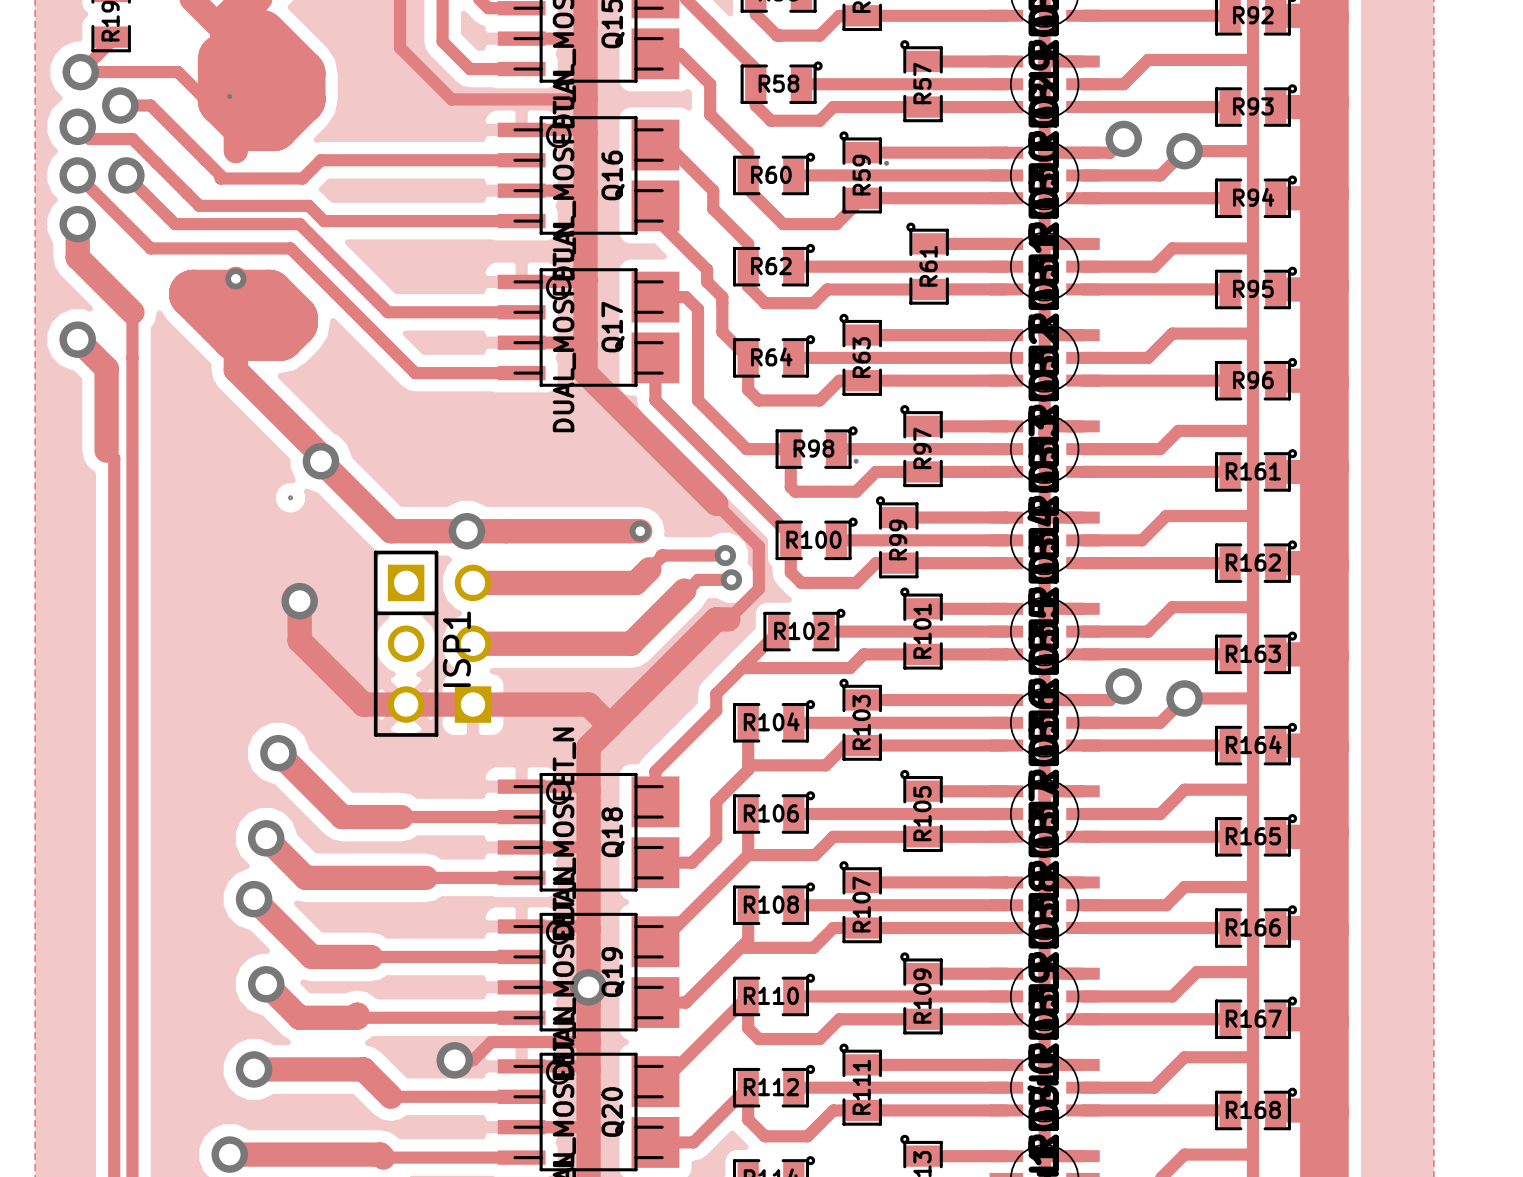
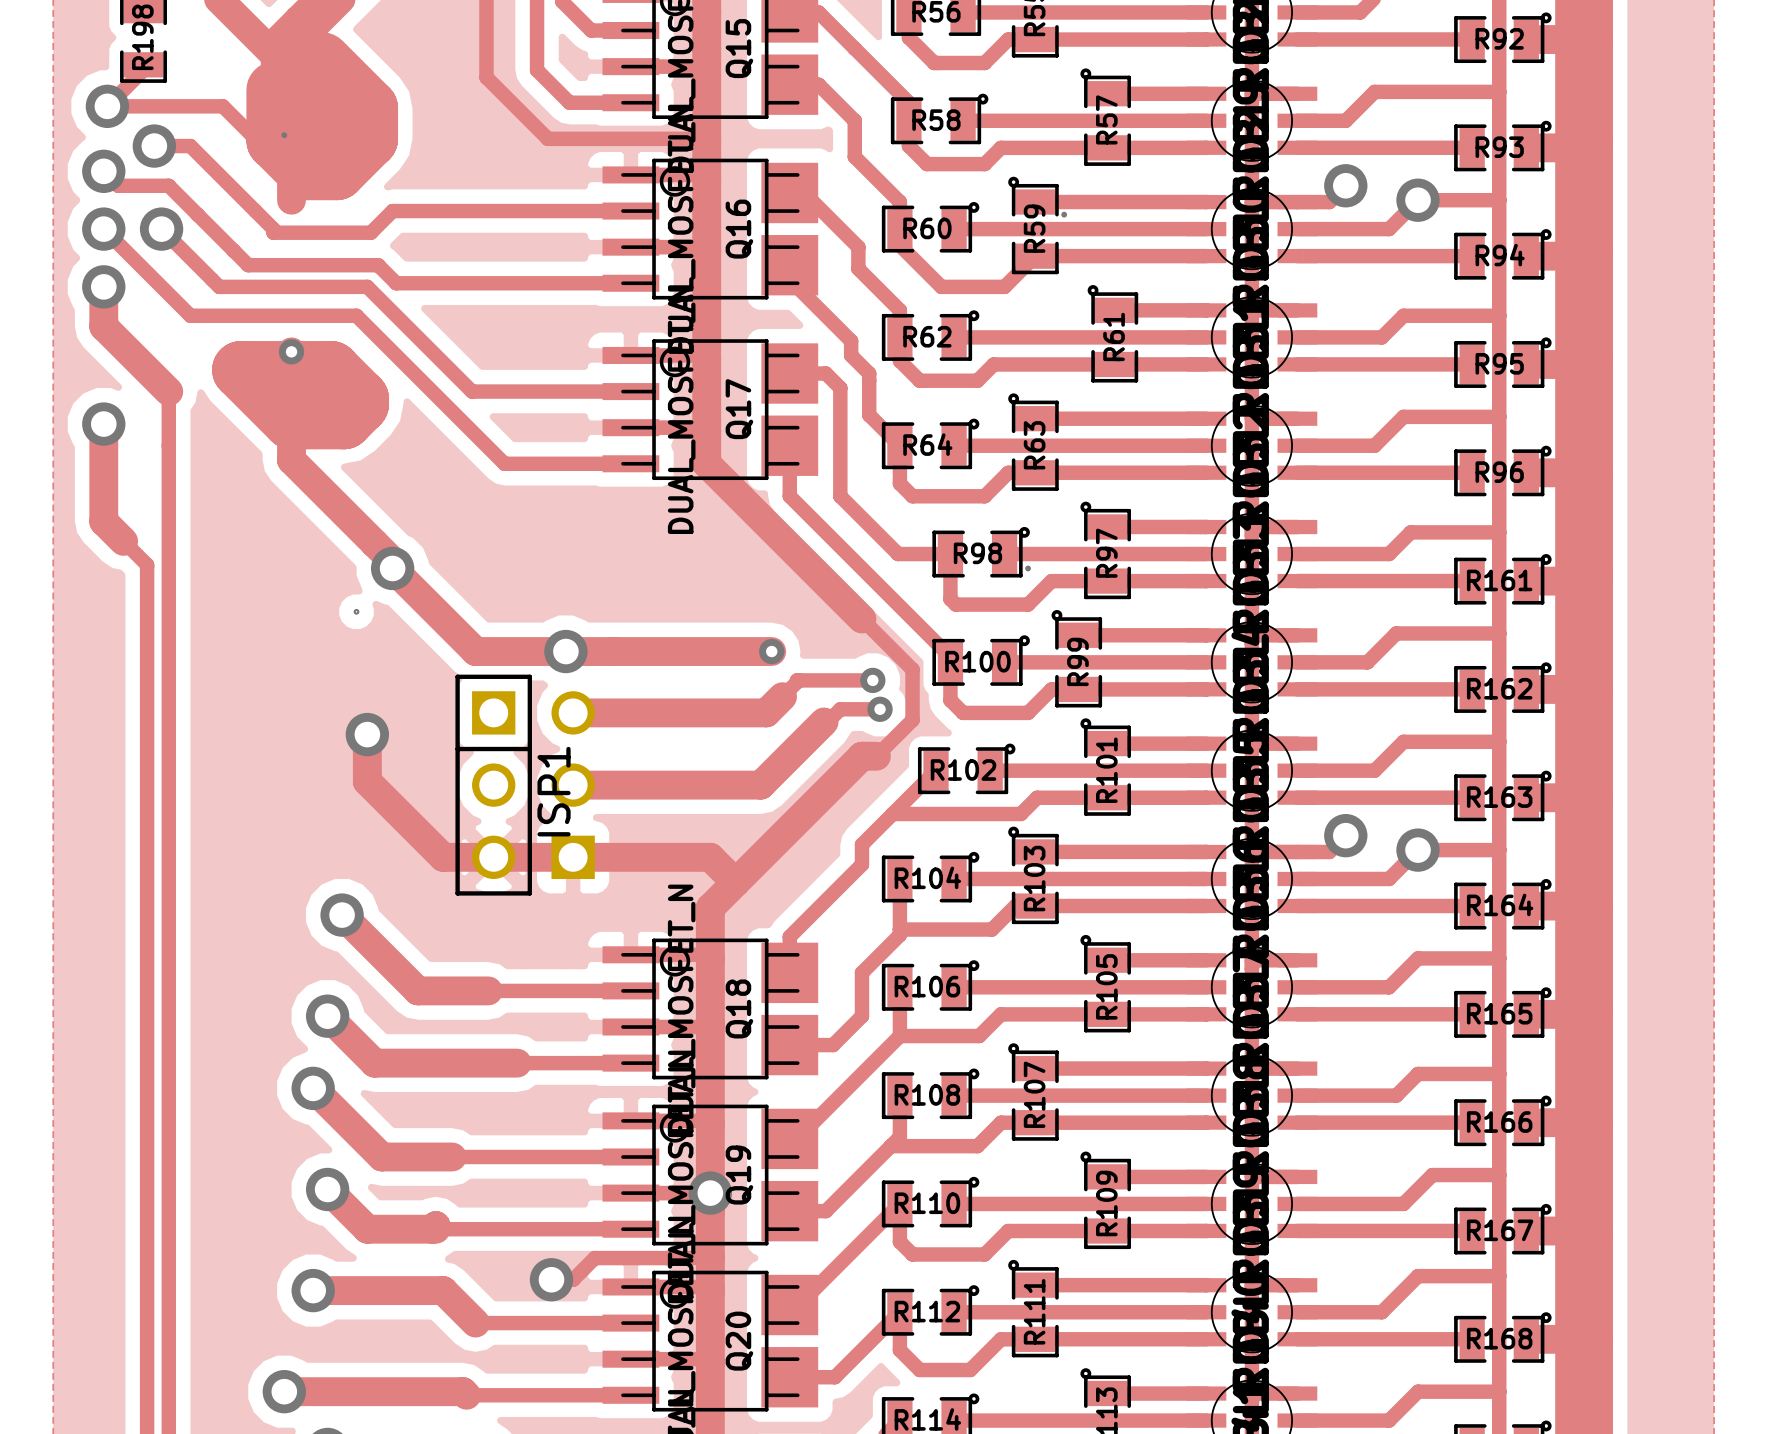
track: (77, 339) (106, 368) (106, 450) -> (103, 424) (103, 521) (138, 555)

